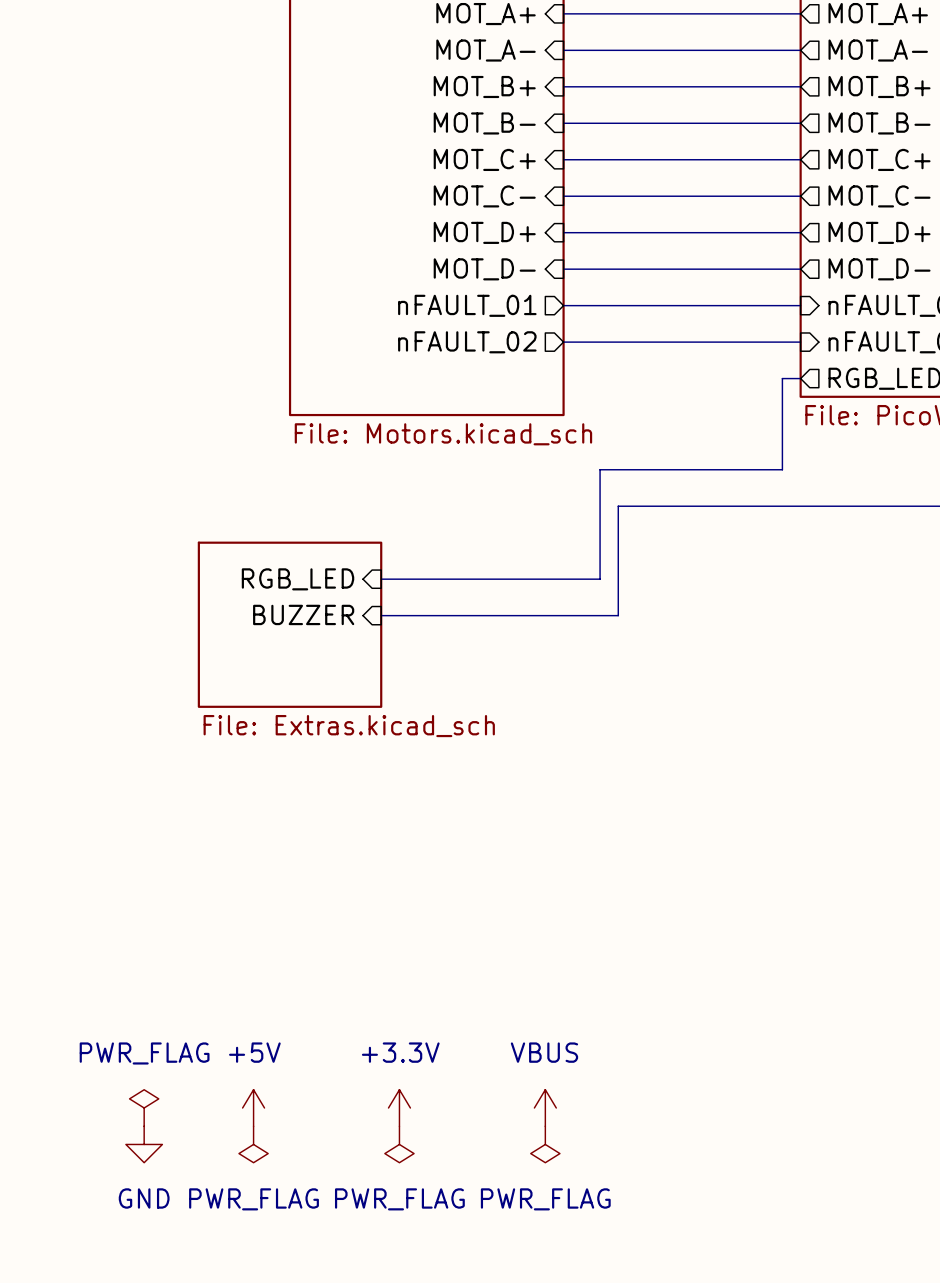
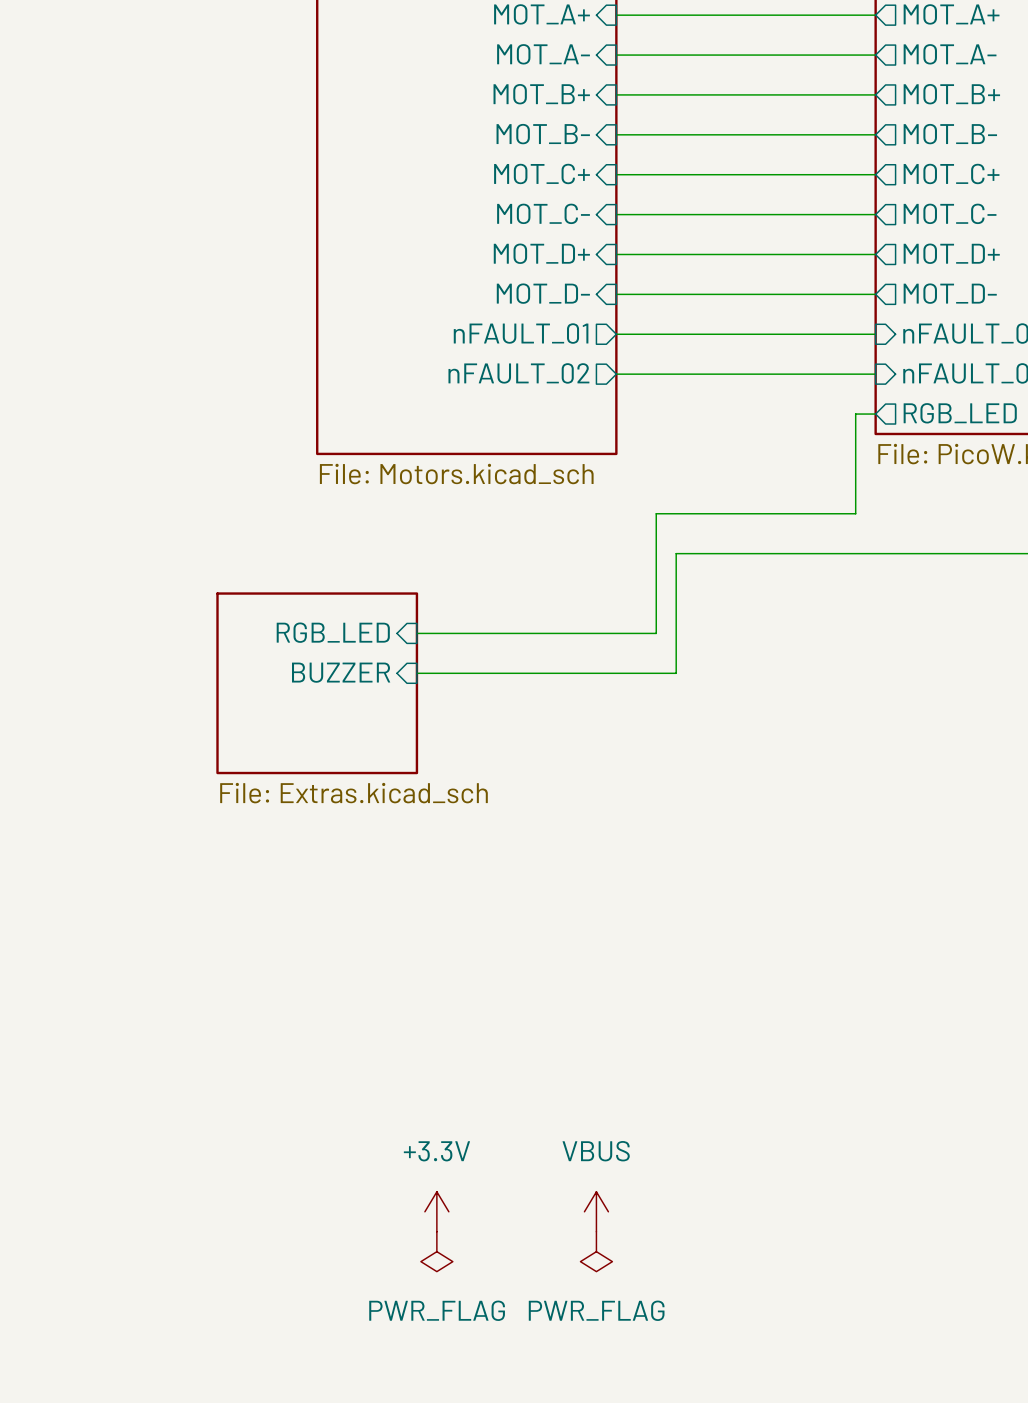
power symbol: PWR_FLAG (144, 1107) -> none
power symbol: +5V (253, 1107) -> none
power symbol: GND (144, 1144) -> none
power symbol: PWR_FLAG (253, 1144) -> none

